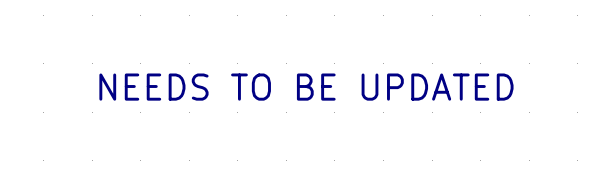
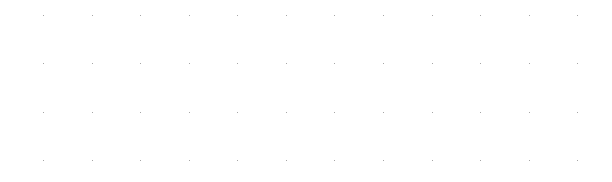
text: NEEDS TO BE UPDATED (306, 87) -> none

